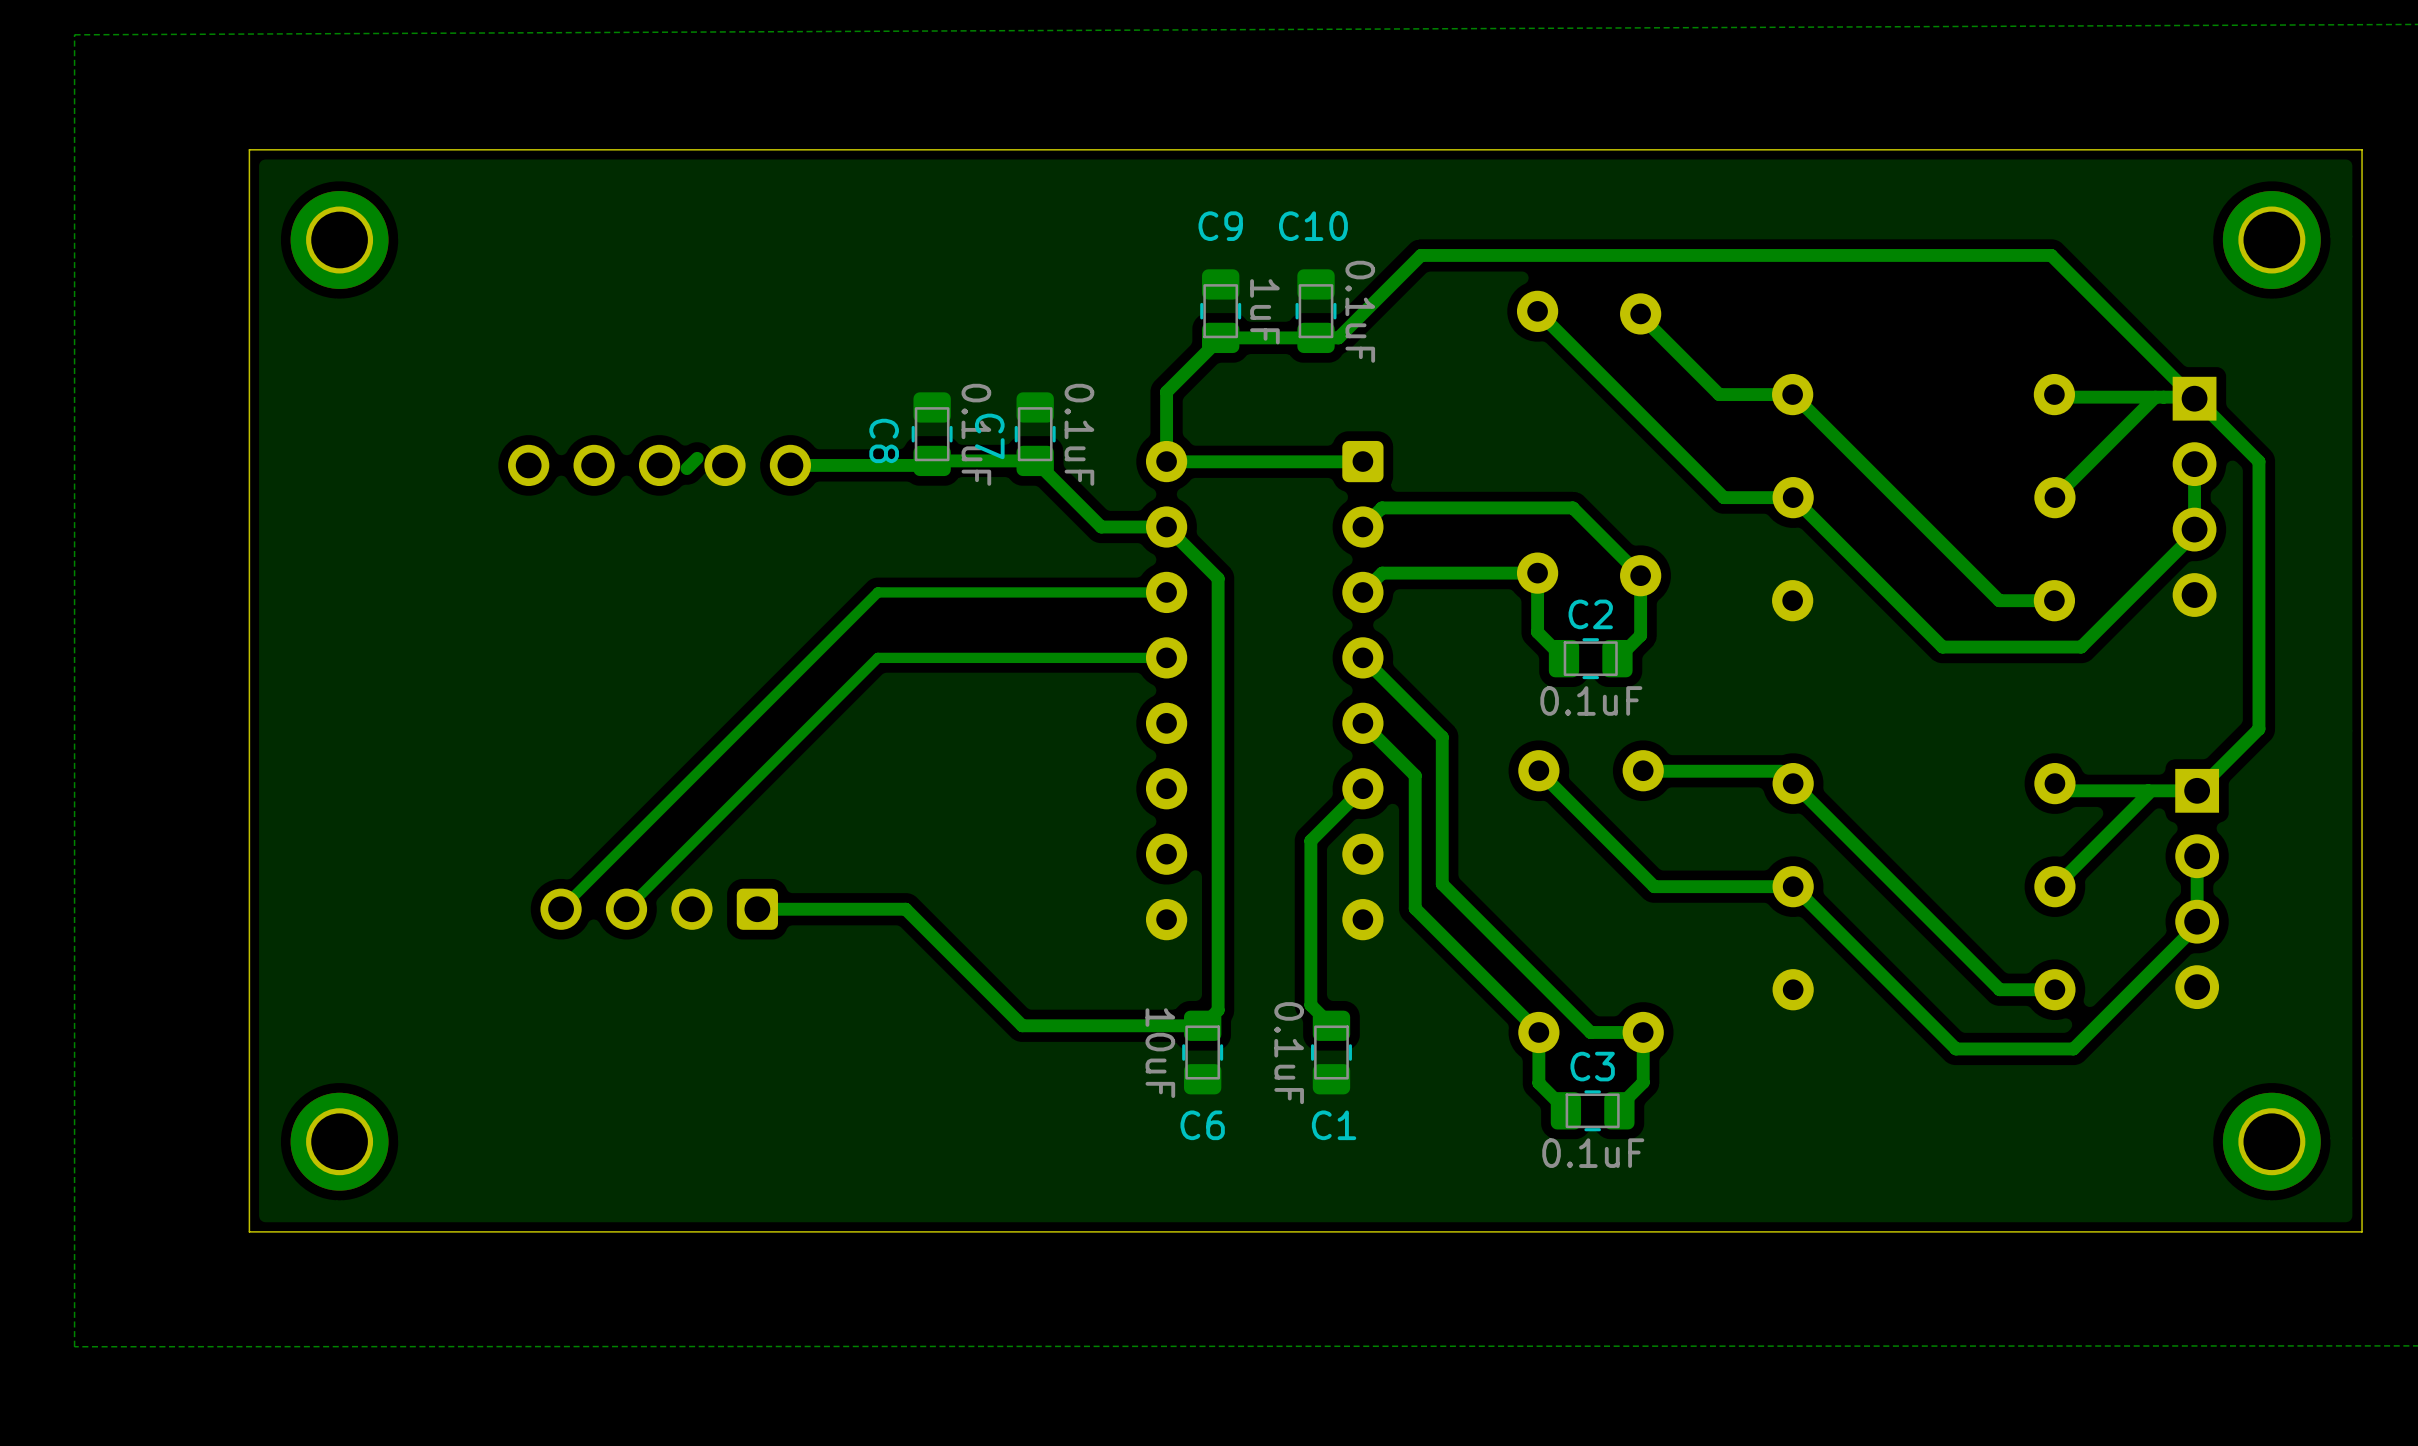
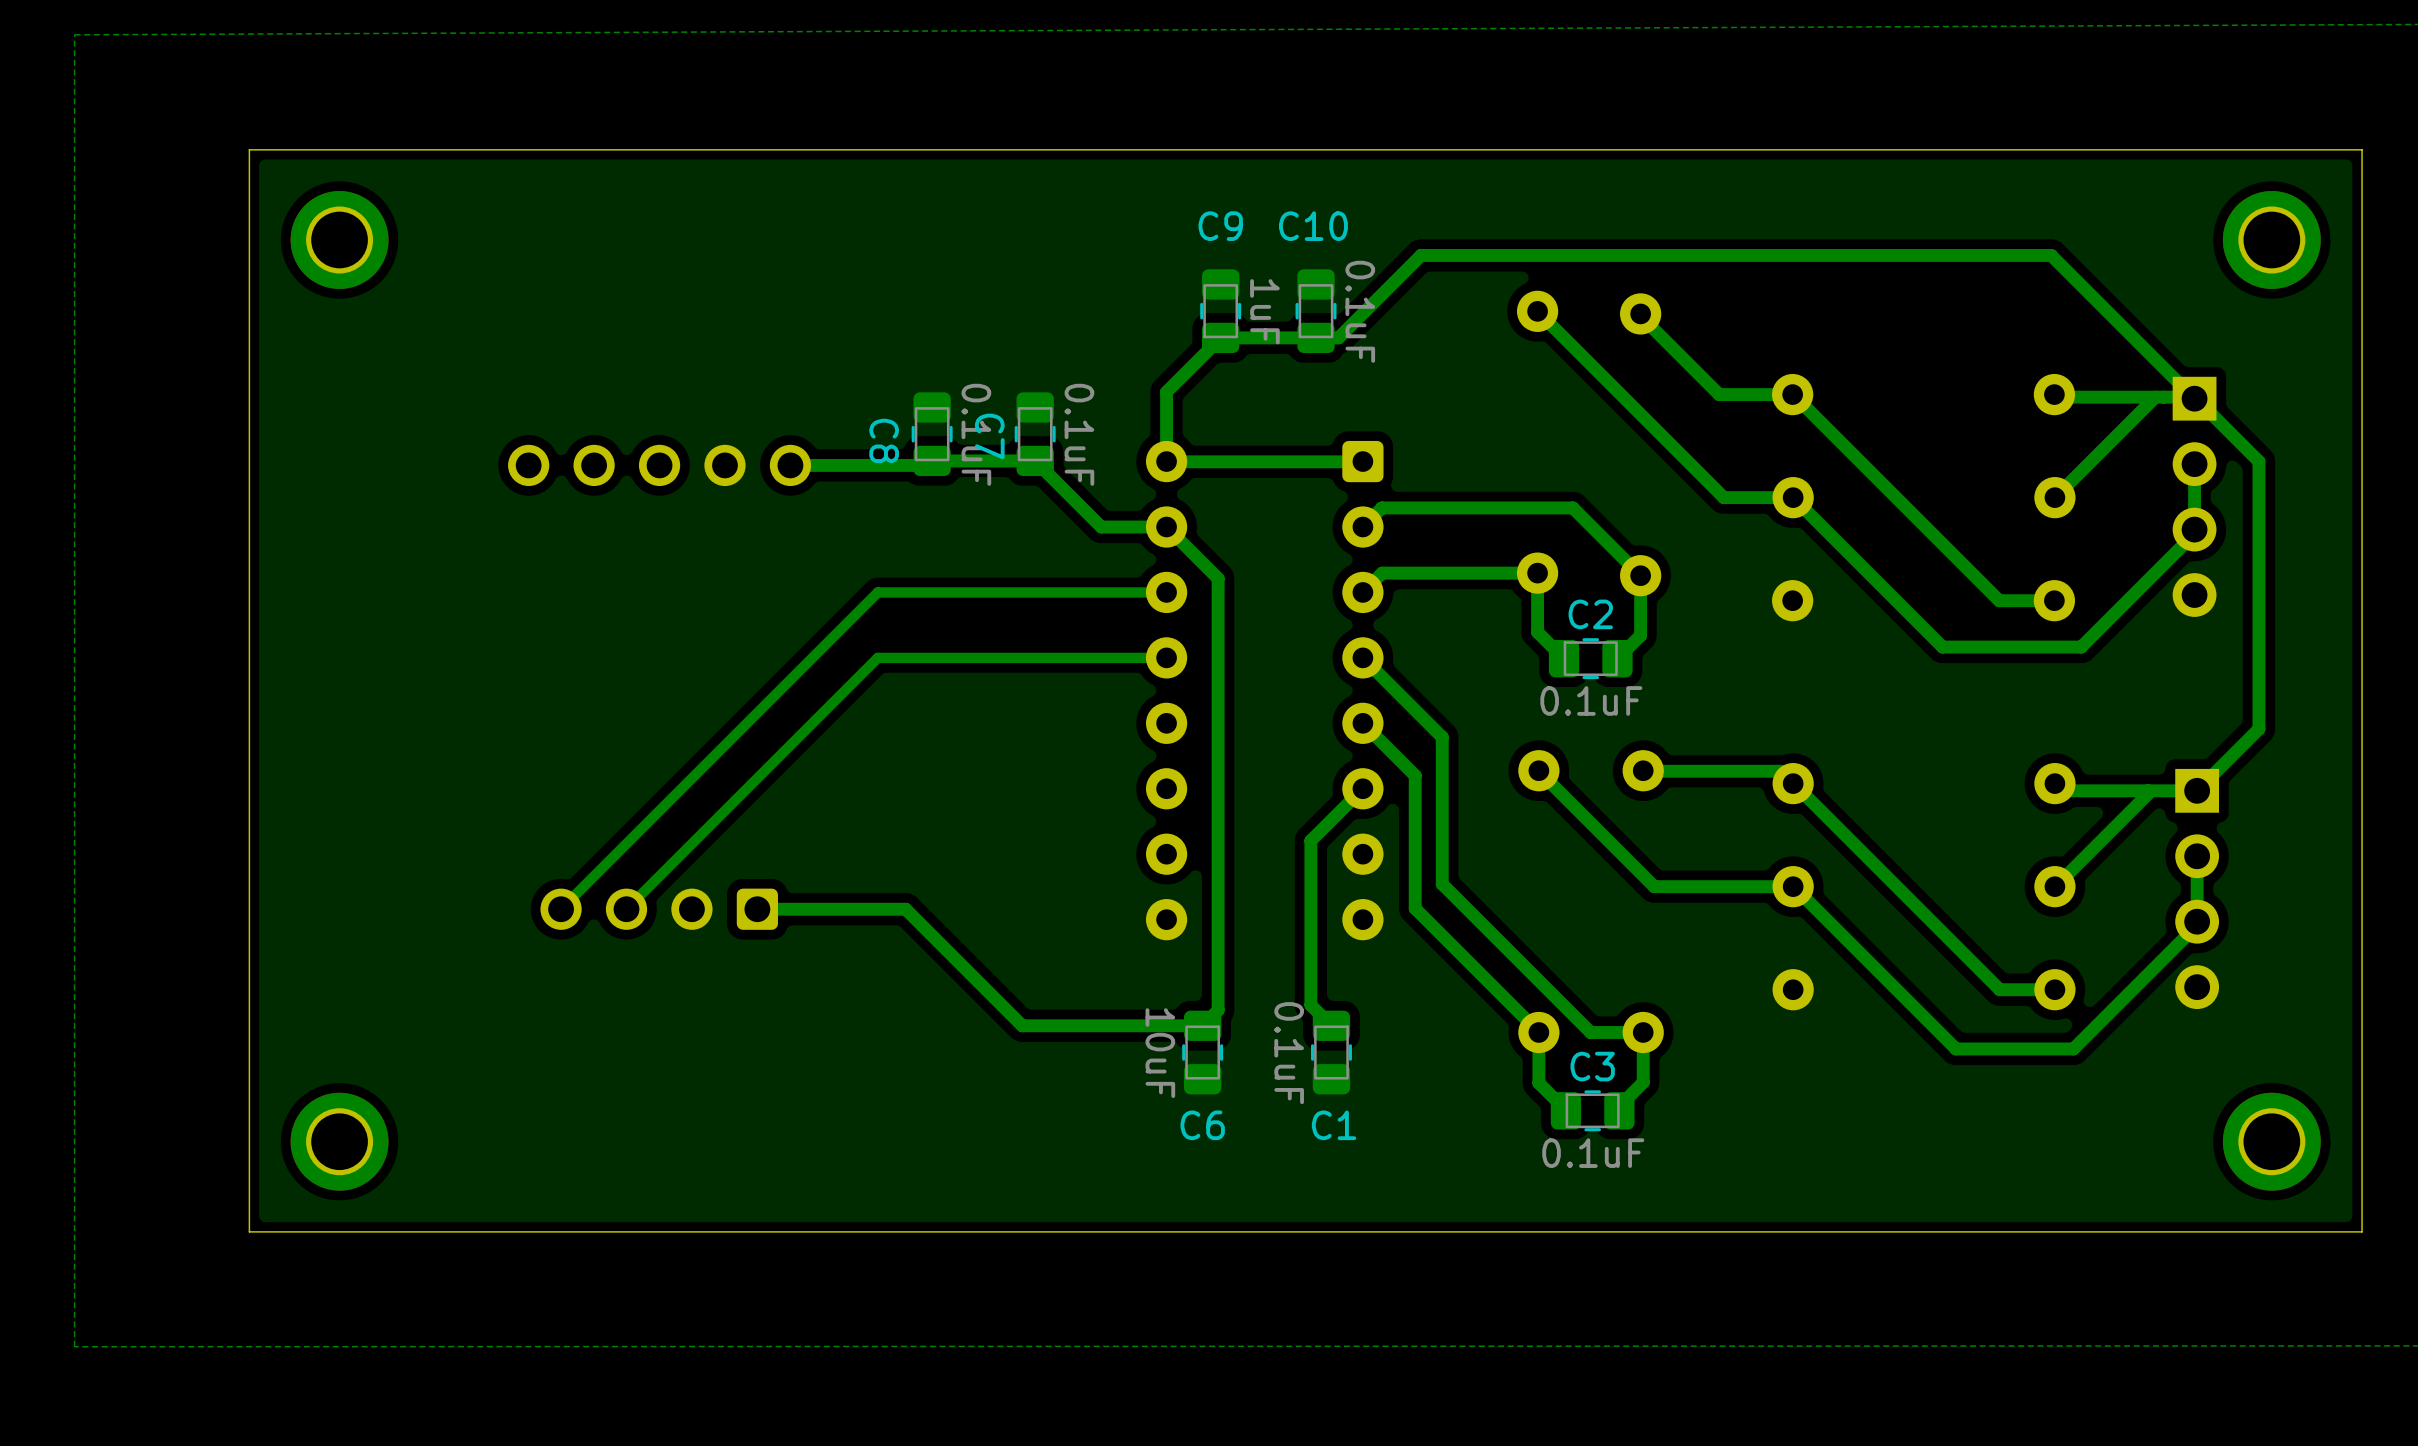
bottom track: (697, 458) (686, 468) -> none

